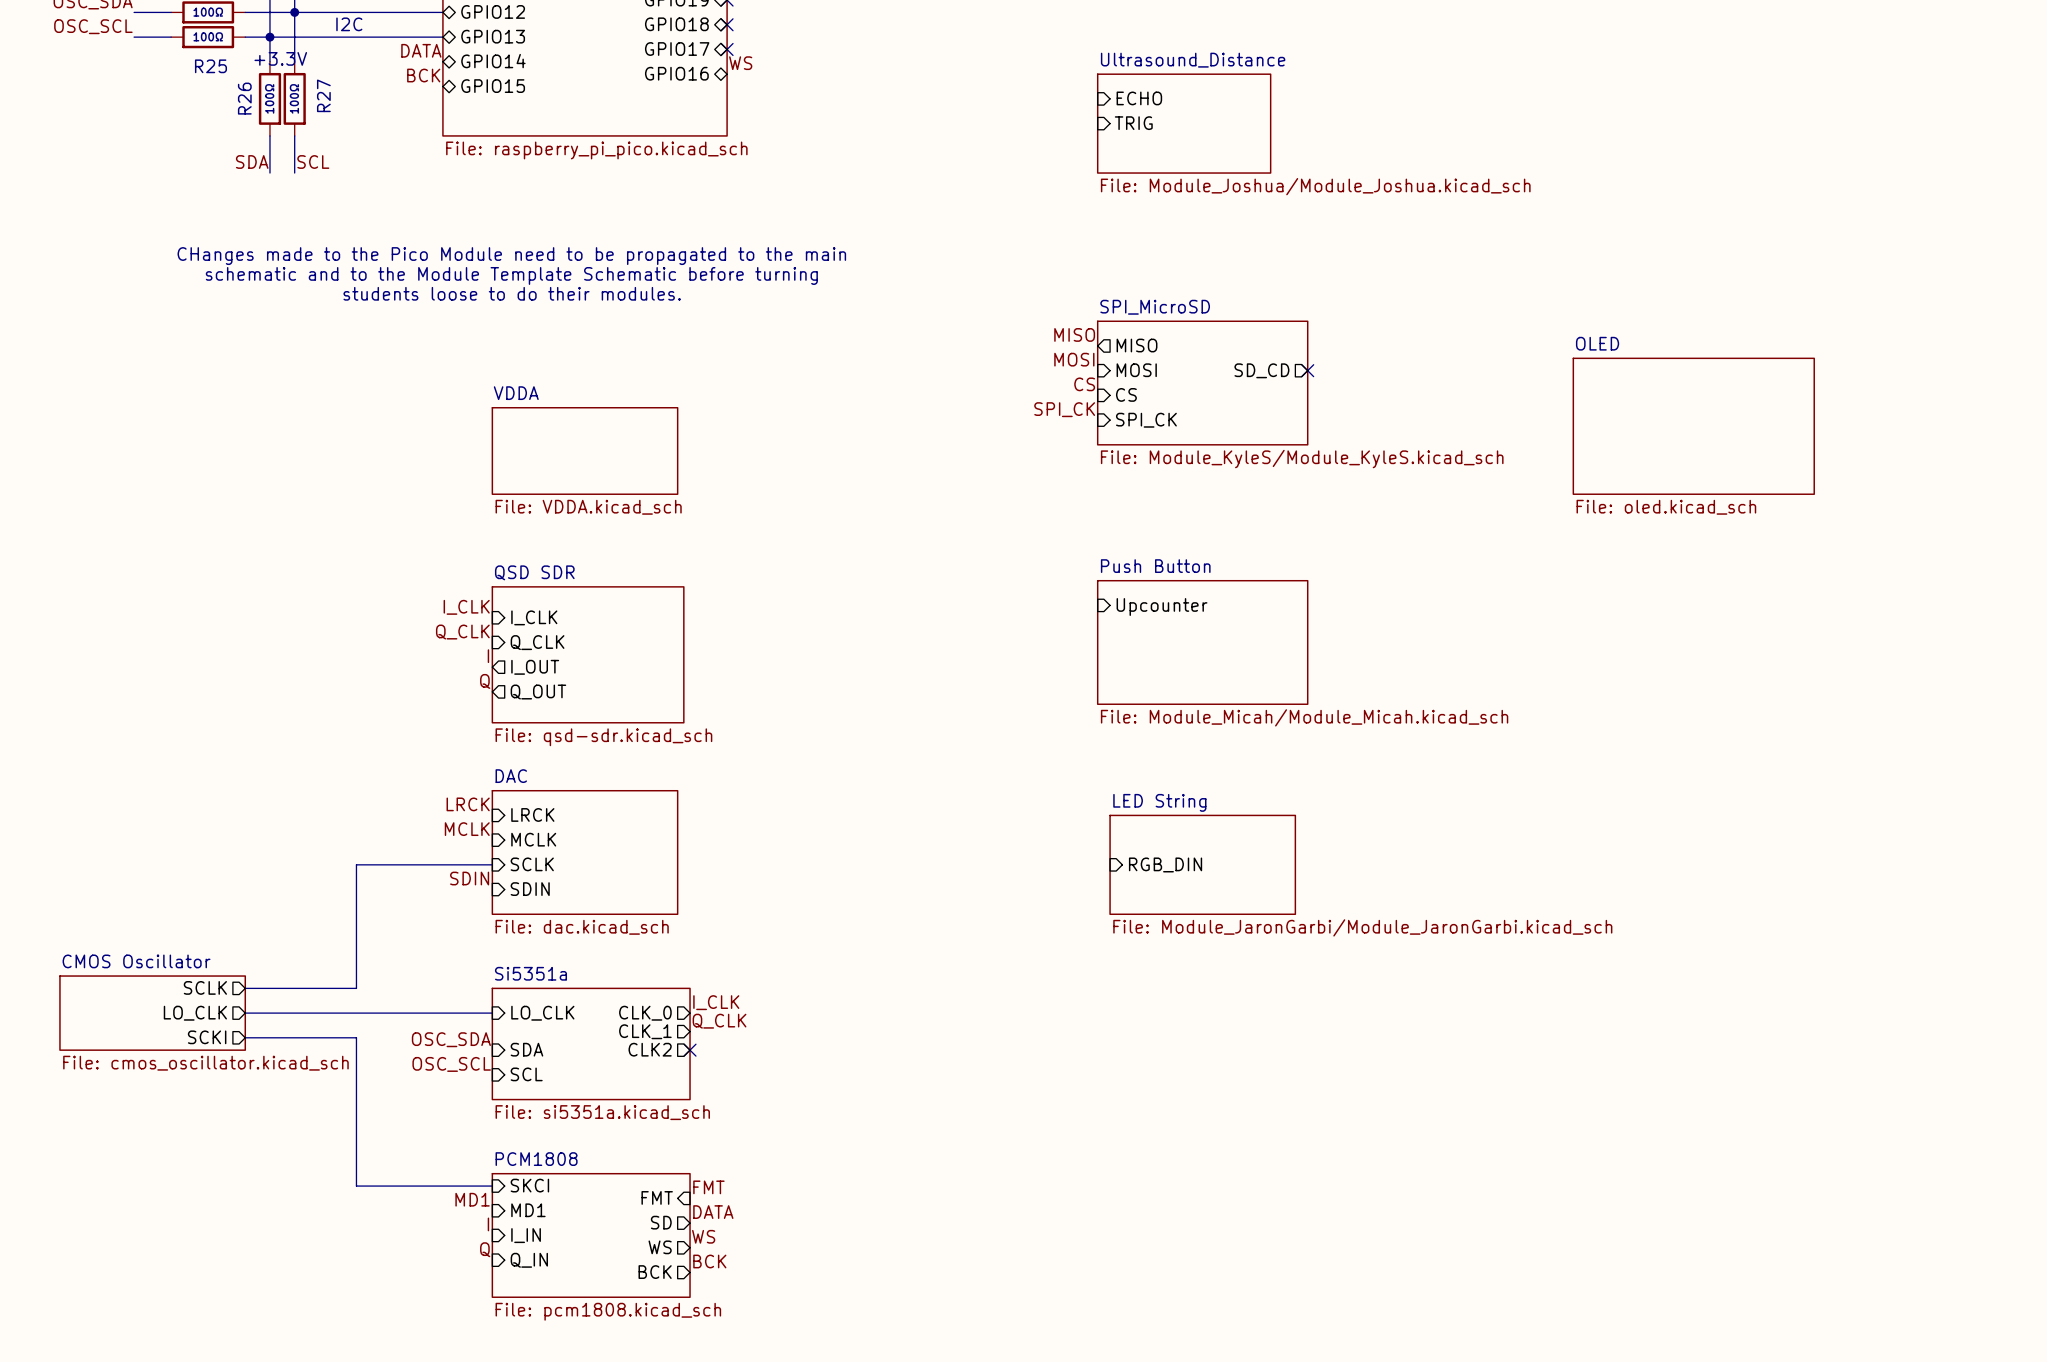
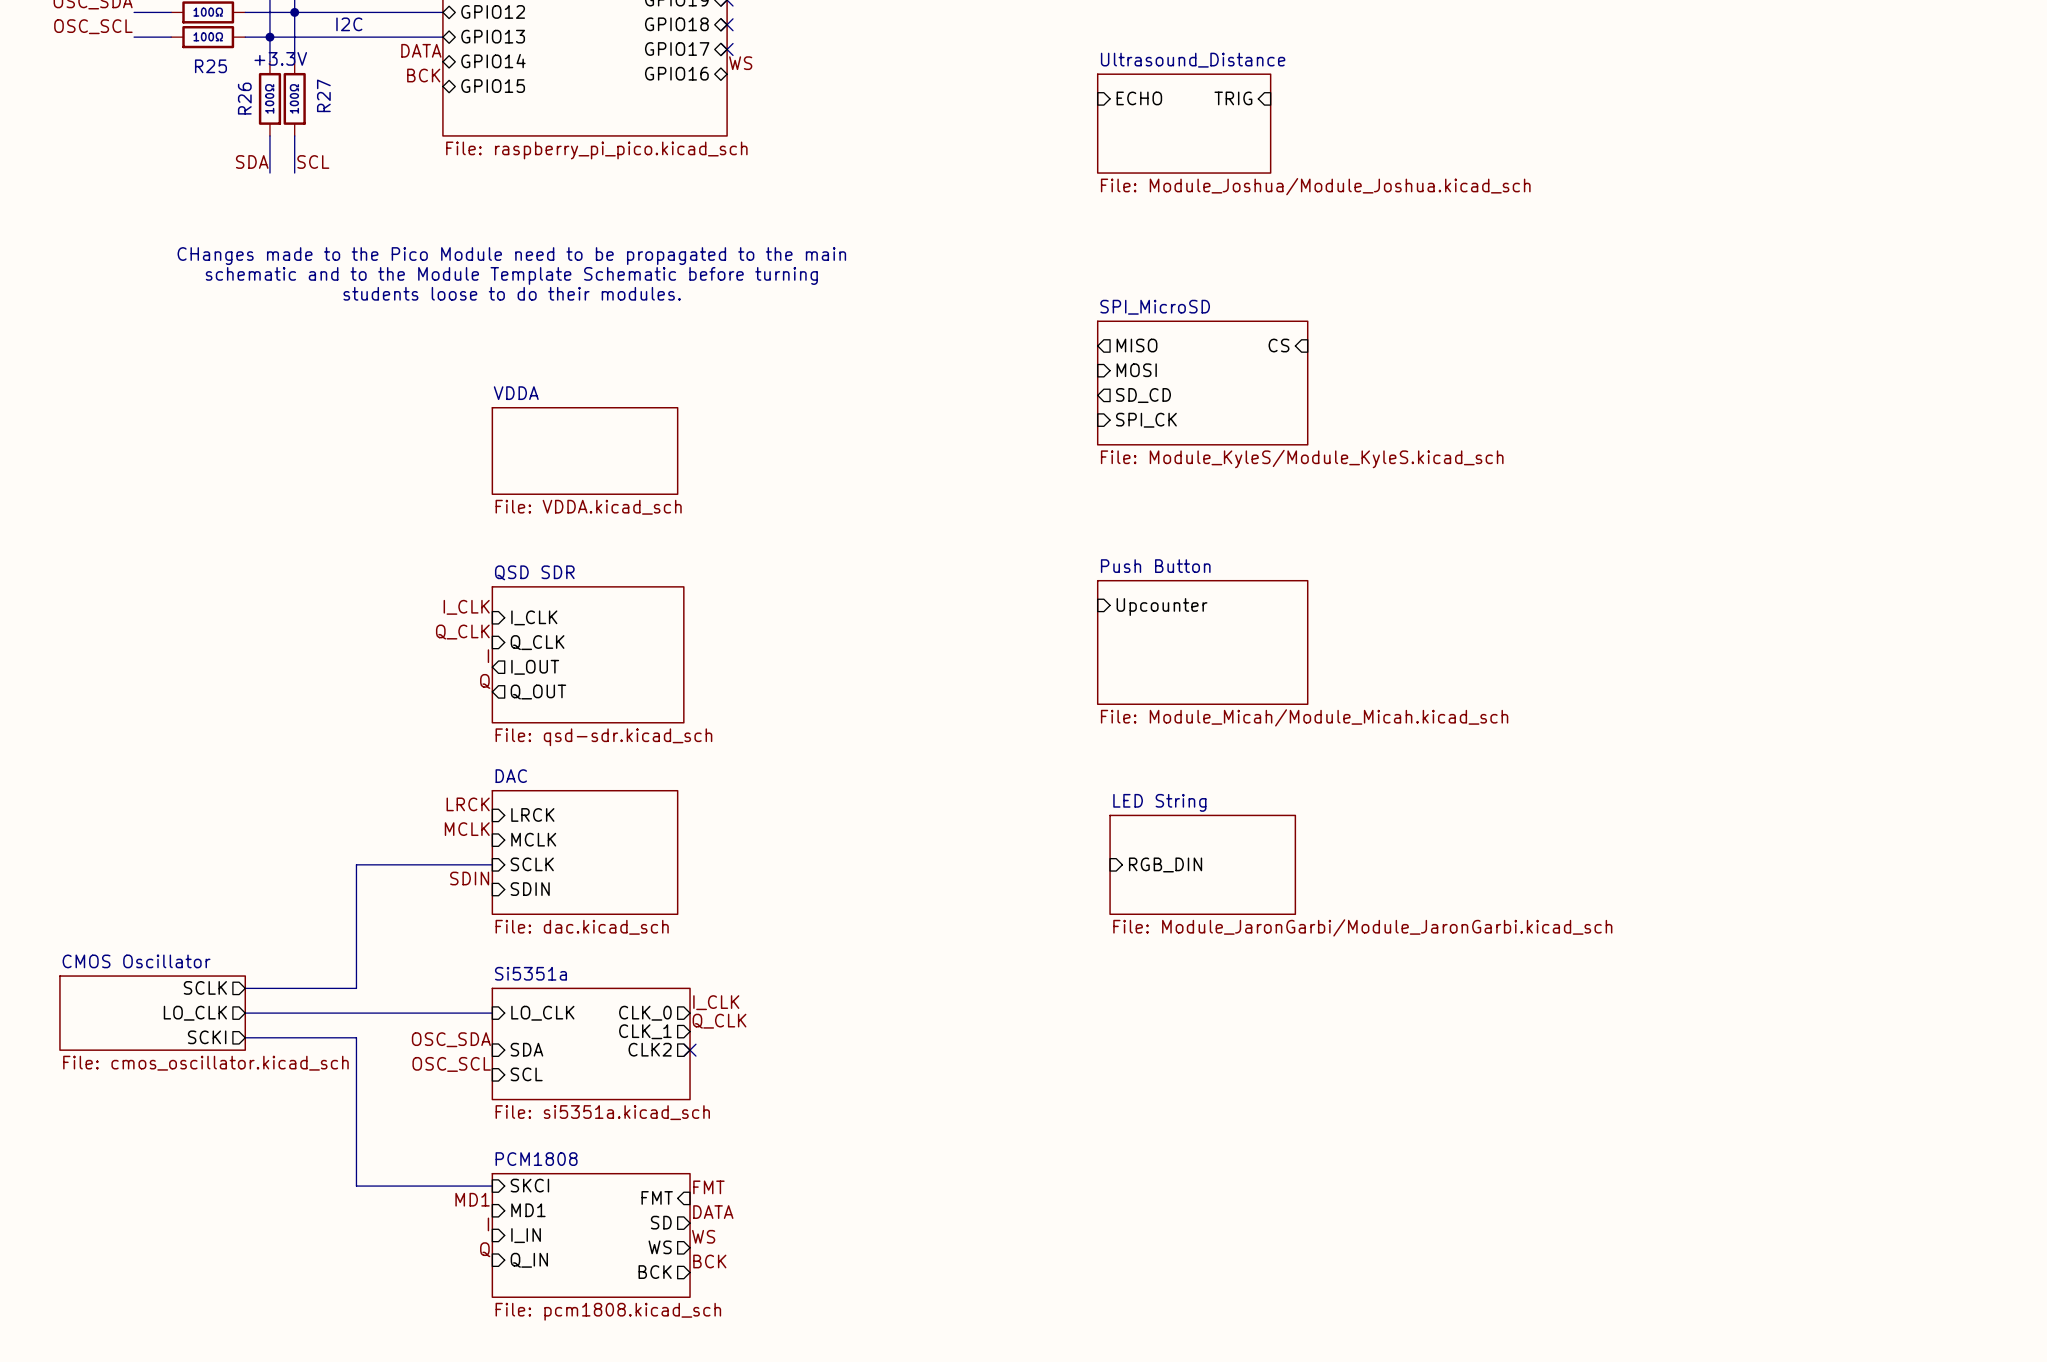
sheet pin rotation: 0° (1133, 123) -> 180° (1233, 98)
sheet pin position: TRIG (1133, 123) -> TRIG (1233, 98)
label: MISO (1074, 334) -> none
sheet pin: none -> CS (1278, 345)
label: MOSI (1074, 359) -> none
sheet pin: SD_CD (1261, 370) -> none
no-connect mark: (1307, 370) -> none
label: CS (1084, 384) -> none
sheet pin shape: input (1126, 394) -> output (1143, 395)
sheet pin: CS (1126, 394) -> SD_CD (1143, 395)
label: SPI_CK (1064, 409) -> none
sheet OLED: File: oled.kicad_sch (1693, 426) -> none

